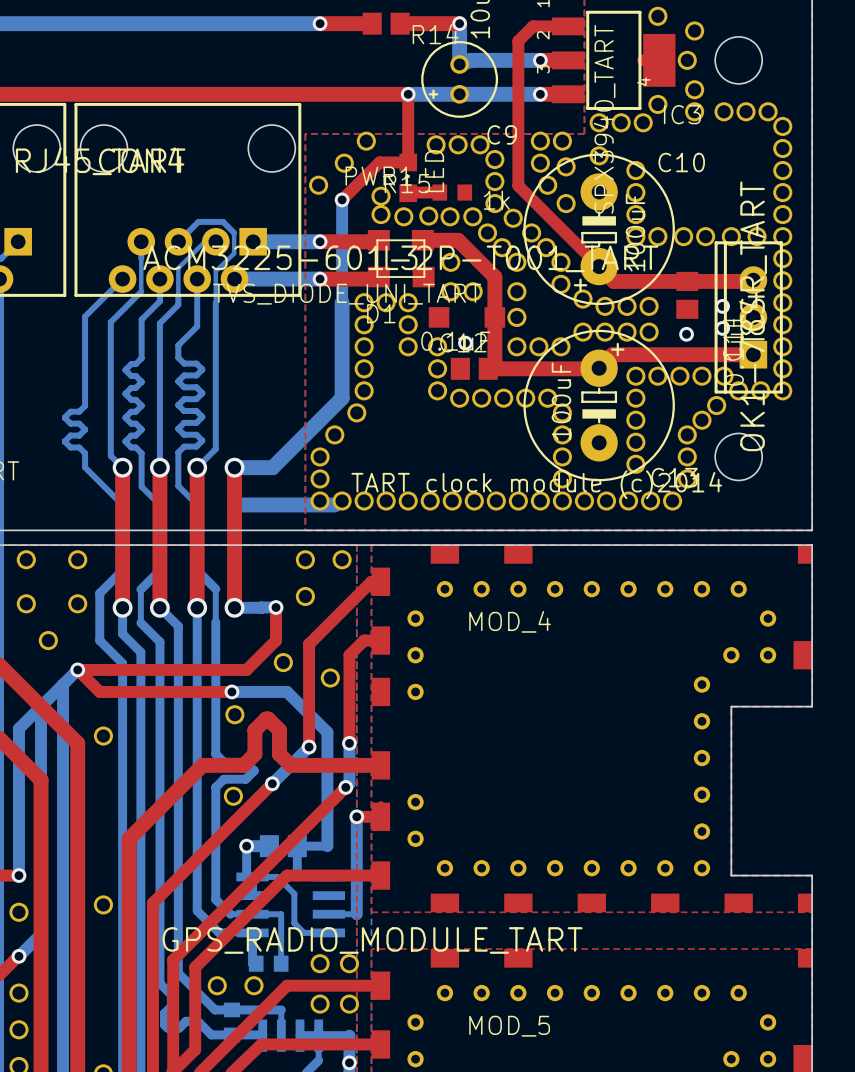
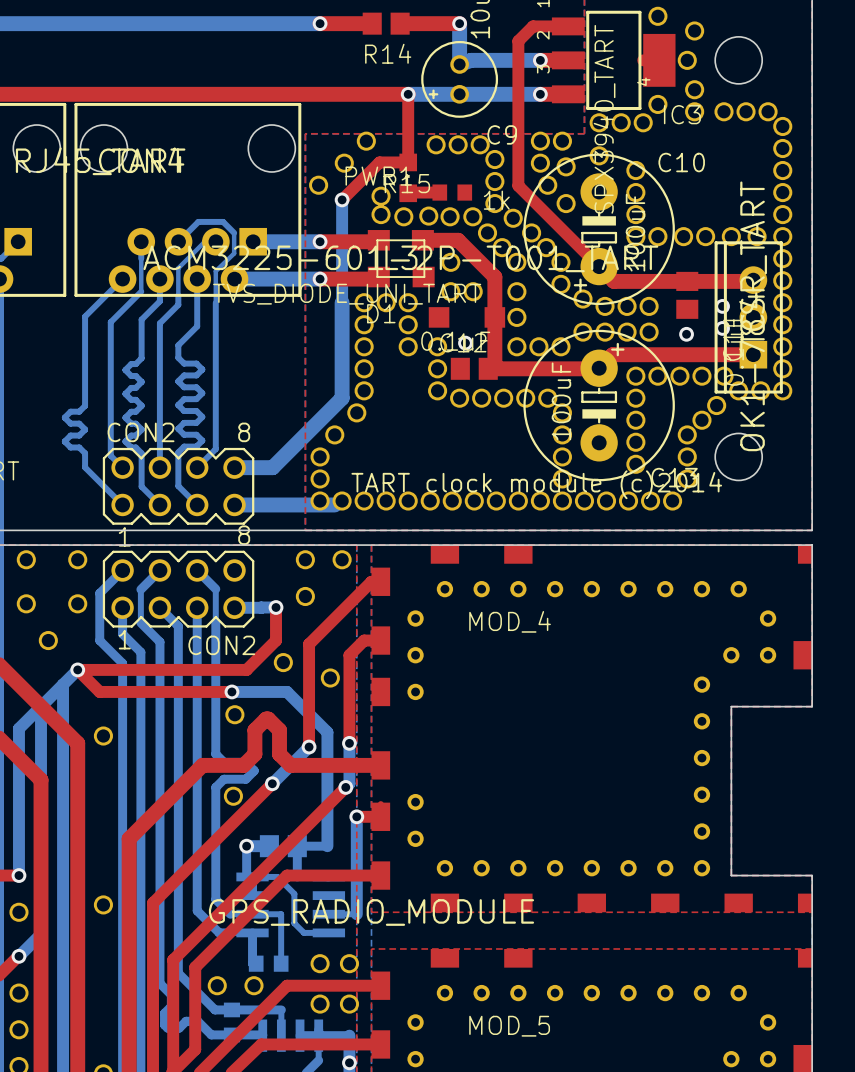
R14 name position: R14 (435, 34) -> R14 (388, 53)
PWR1 value: LED (434, 171) -> none
top track: (122, 467) (122, 607) -> none
via: (122, 467) -> none
top track: (159, 467) (159, 607) -> none
via: (159, 467) -> none
top track: (197, 467) (197, 607) -> none
via: (197, 467) -> none
top track: (234, 467) (234, 607) -> none
via: (234, 467) -> none
CON2: none -> (178, 486)
CON2: none -> (178, 589)
via: (122, 607) -> none
via: (159, 607) -> none
via: (197, 607) -> none
via: (234, 607) -> none
MOD_4 value: GPS_RADIO_MODULE_TART (372, 940) -> GPS_RADIO_MODULE (371, 912)

